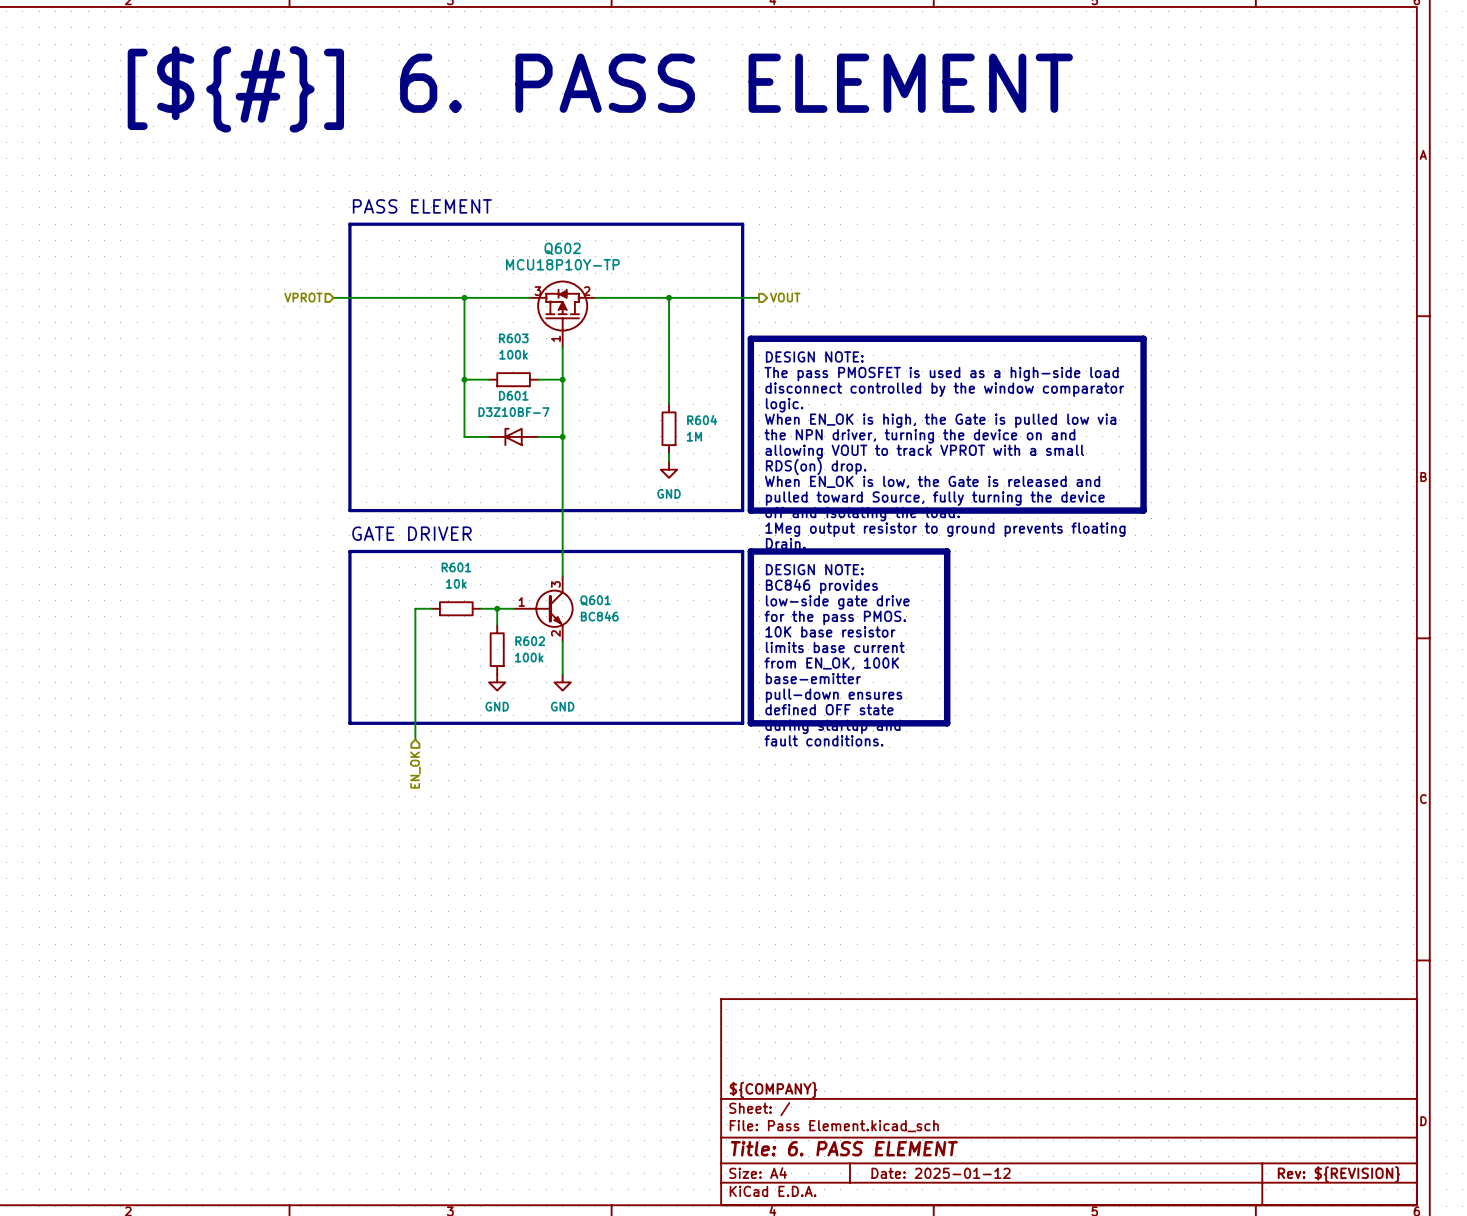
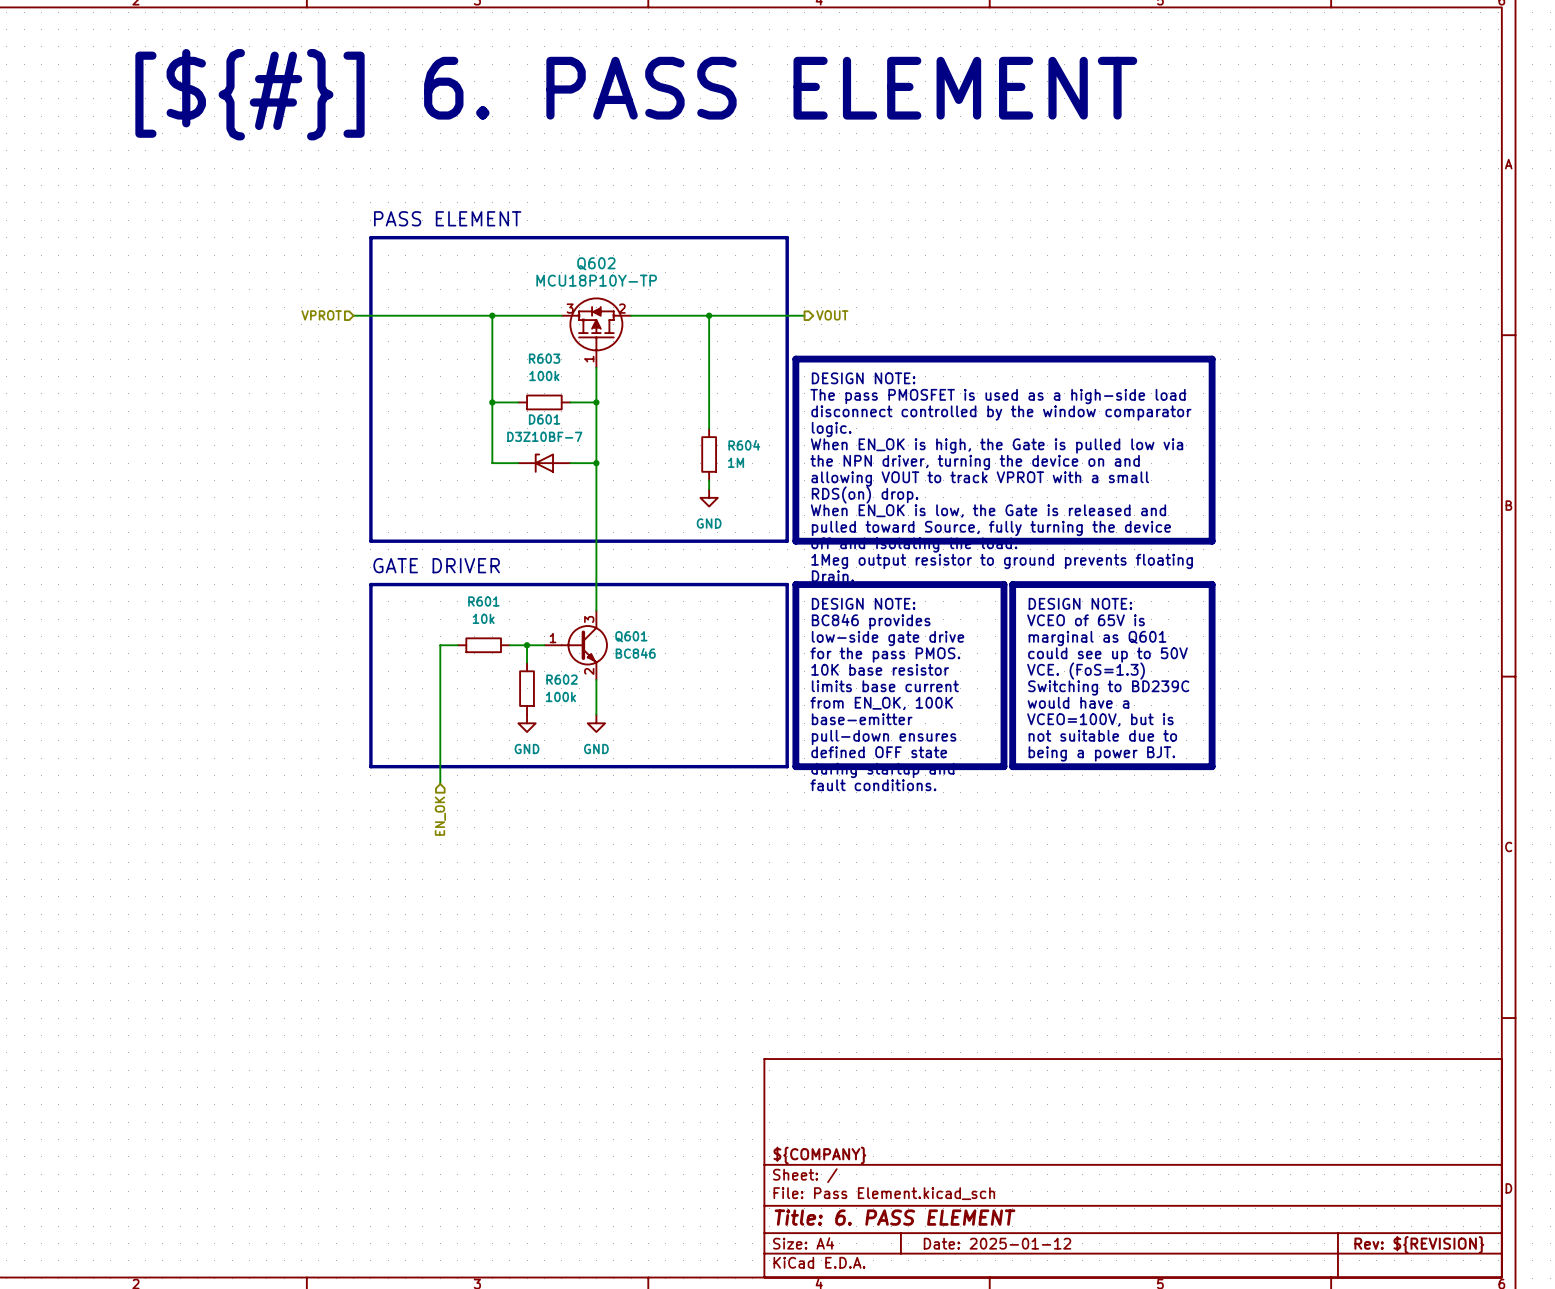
line: none -> (1012, 584) (1212, 584) (1212, 766) (1012, 766) (1012, 584)
text: none -> DESIGN NOTE: (1080, 603)
text: none -> VCEO of 65V is (1086, 620)
text: none -> marginal as Q601 (1097, 638)
text: none -> could see up to 50V (1107, 655)
text: none -> VCE. (FoS=1.3) (1086, 671)
text: none -> Switching to BD239C (1108, 687)
text: none -> would have a (1078, 702)
text: none -> VCEO=100V, but is (1100, 719)
text: none -> not suitable due to (1102, 735)
text: none -> being a power BJT. (1101, 753)

